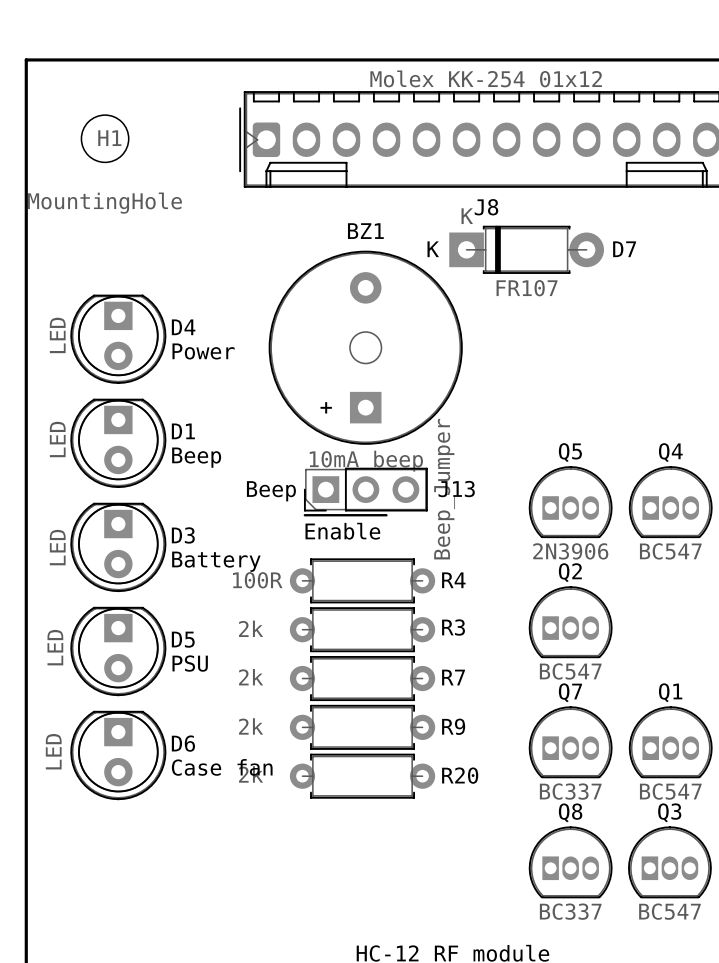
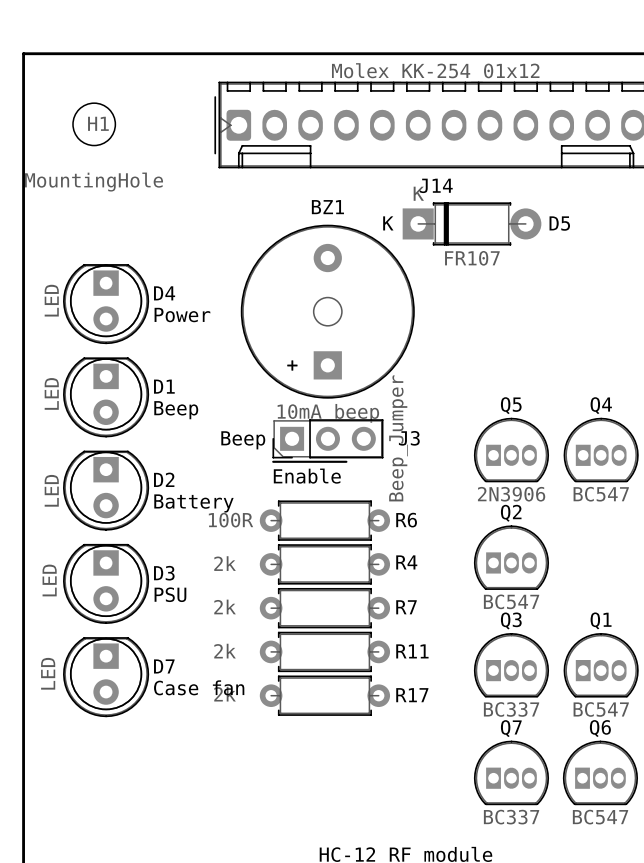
J8 name: J8 (486, 207) -> J14 (436, 185)
D7 name: D7 (624, 249) -> D5 (559, 223)
J13 name: J13 (456, 489) -> J3 (409, 438)
D3 name: D3 (183, 535) -> D2 (164, 479)
R4 name: R4 (453, 580) -> R6 (406, 520)
R3 name: R3 (453, 627) -> R4 (406, 562)
D5 name: D5 (183, 639) -> D3 (164, 573)
Q7 name: Q7 (570, 692) -> Q3 (511, 620)
R9 name: R9 (453, 726) -> R11 (412, 651)
D6 name: D6 (183, 743) -> D7 (164, 666)
R20 name: R20 (460, 775) -> R17 (412, 695)
Q8 name: Q8 (570, 812) -> Q7 (511, 728)
Q3 name: Q3 (669, 812) -> Q6 (600, 728)

